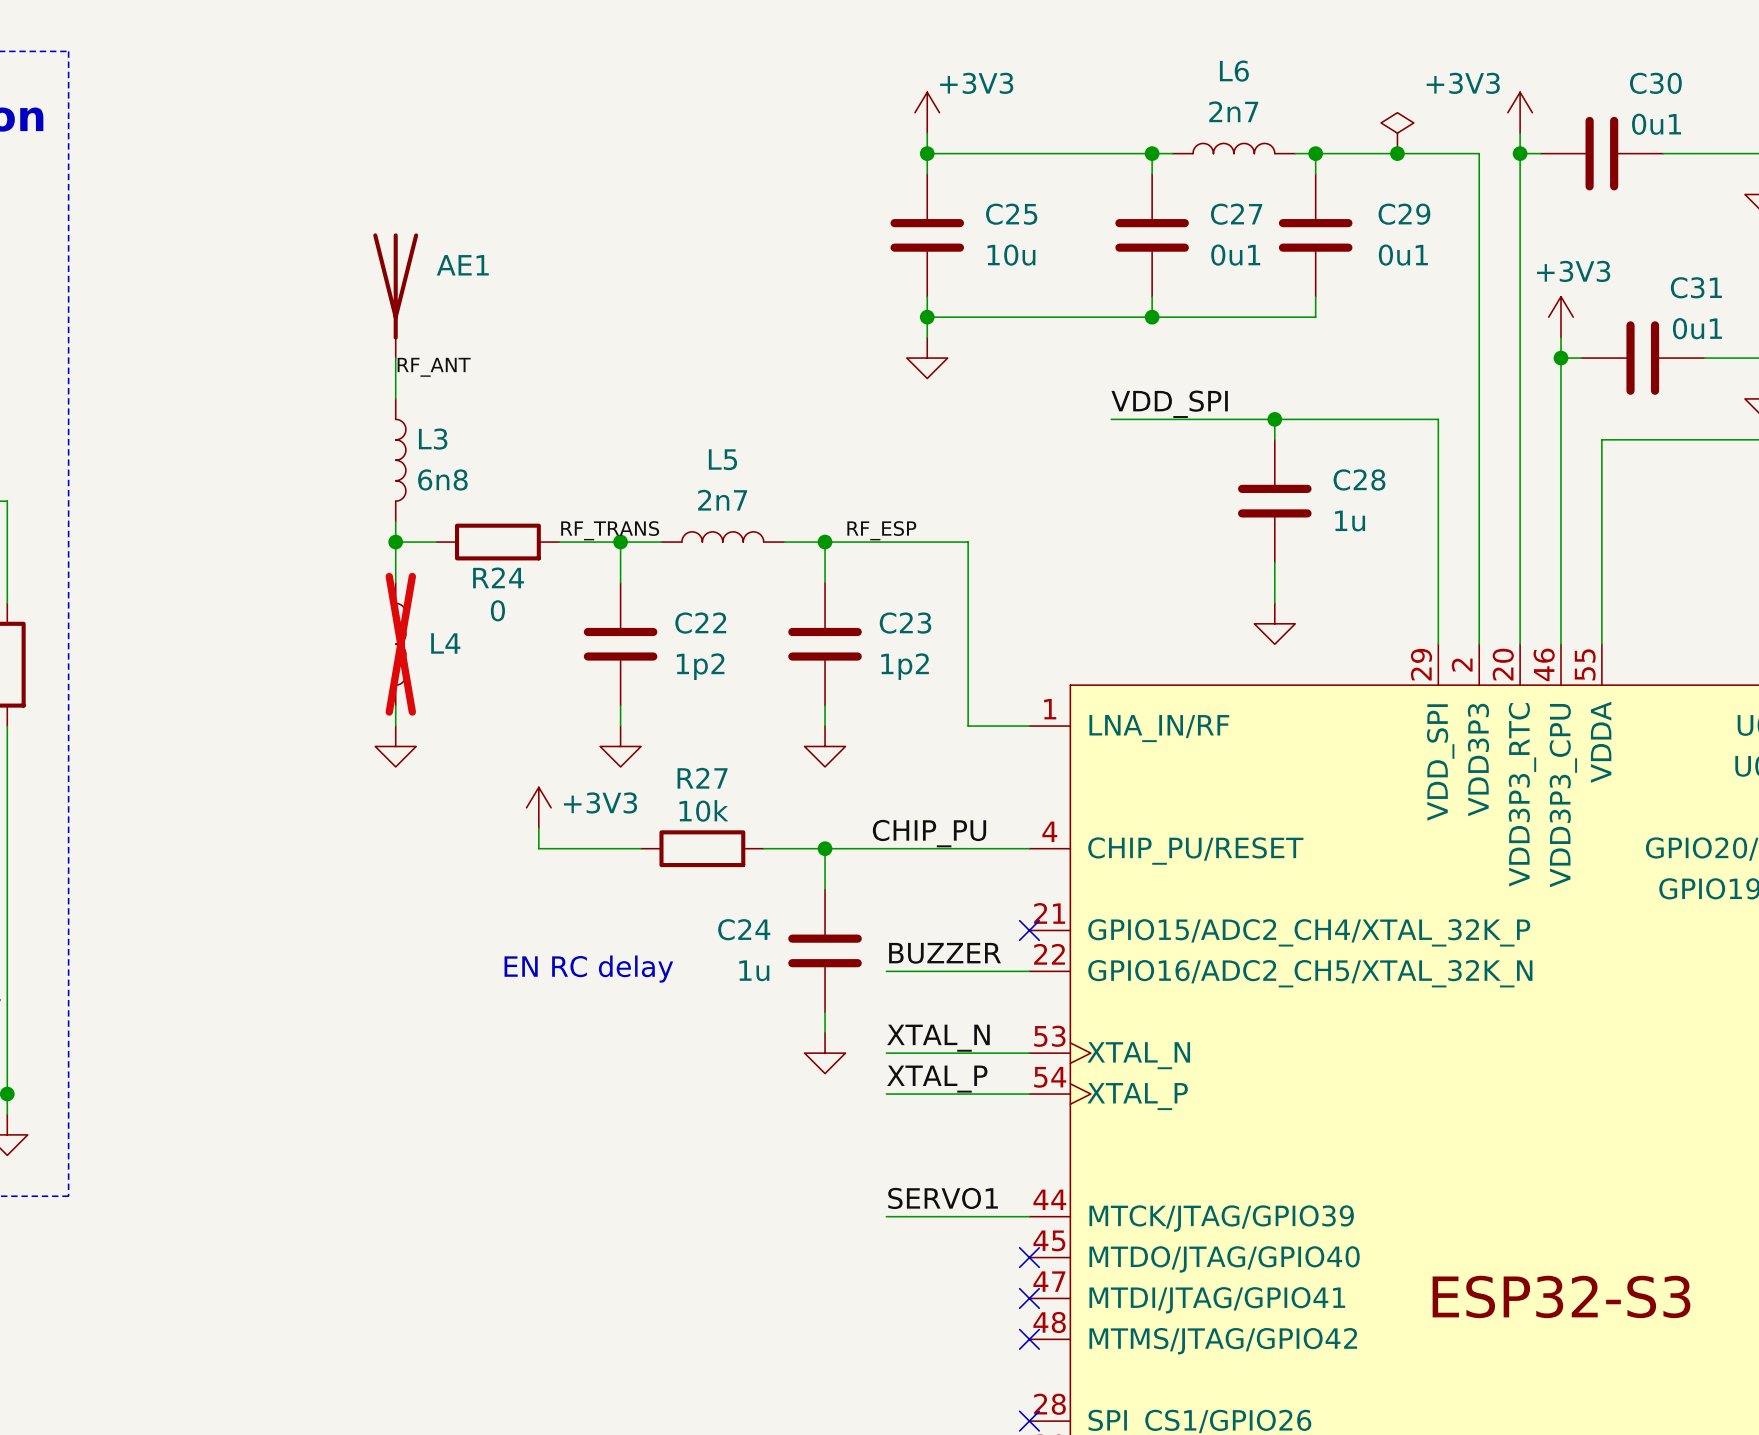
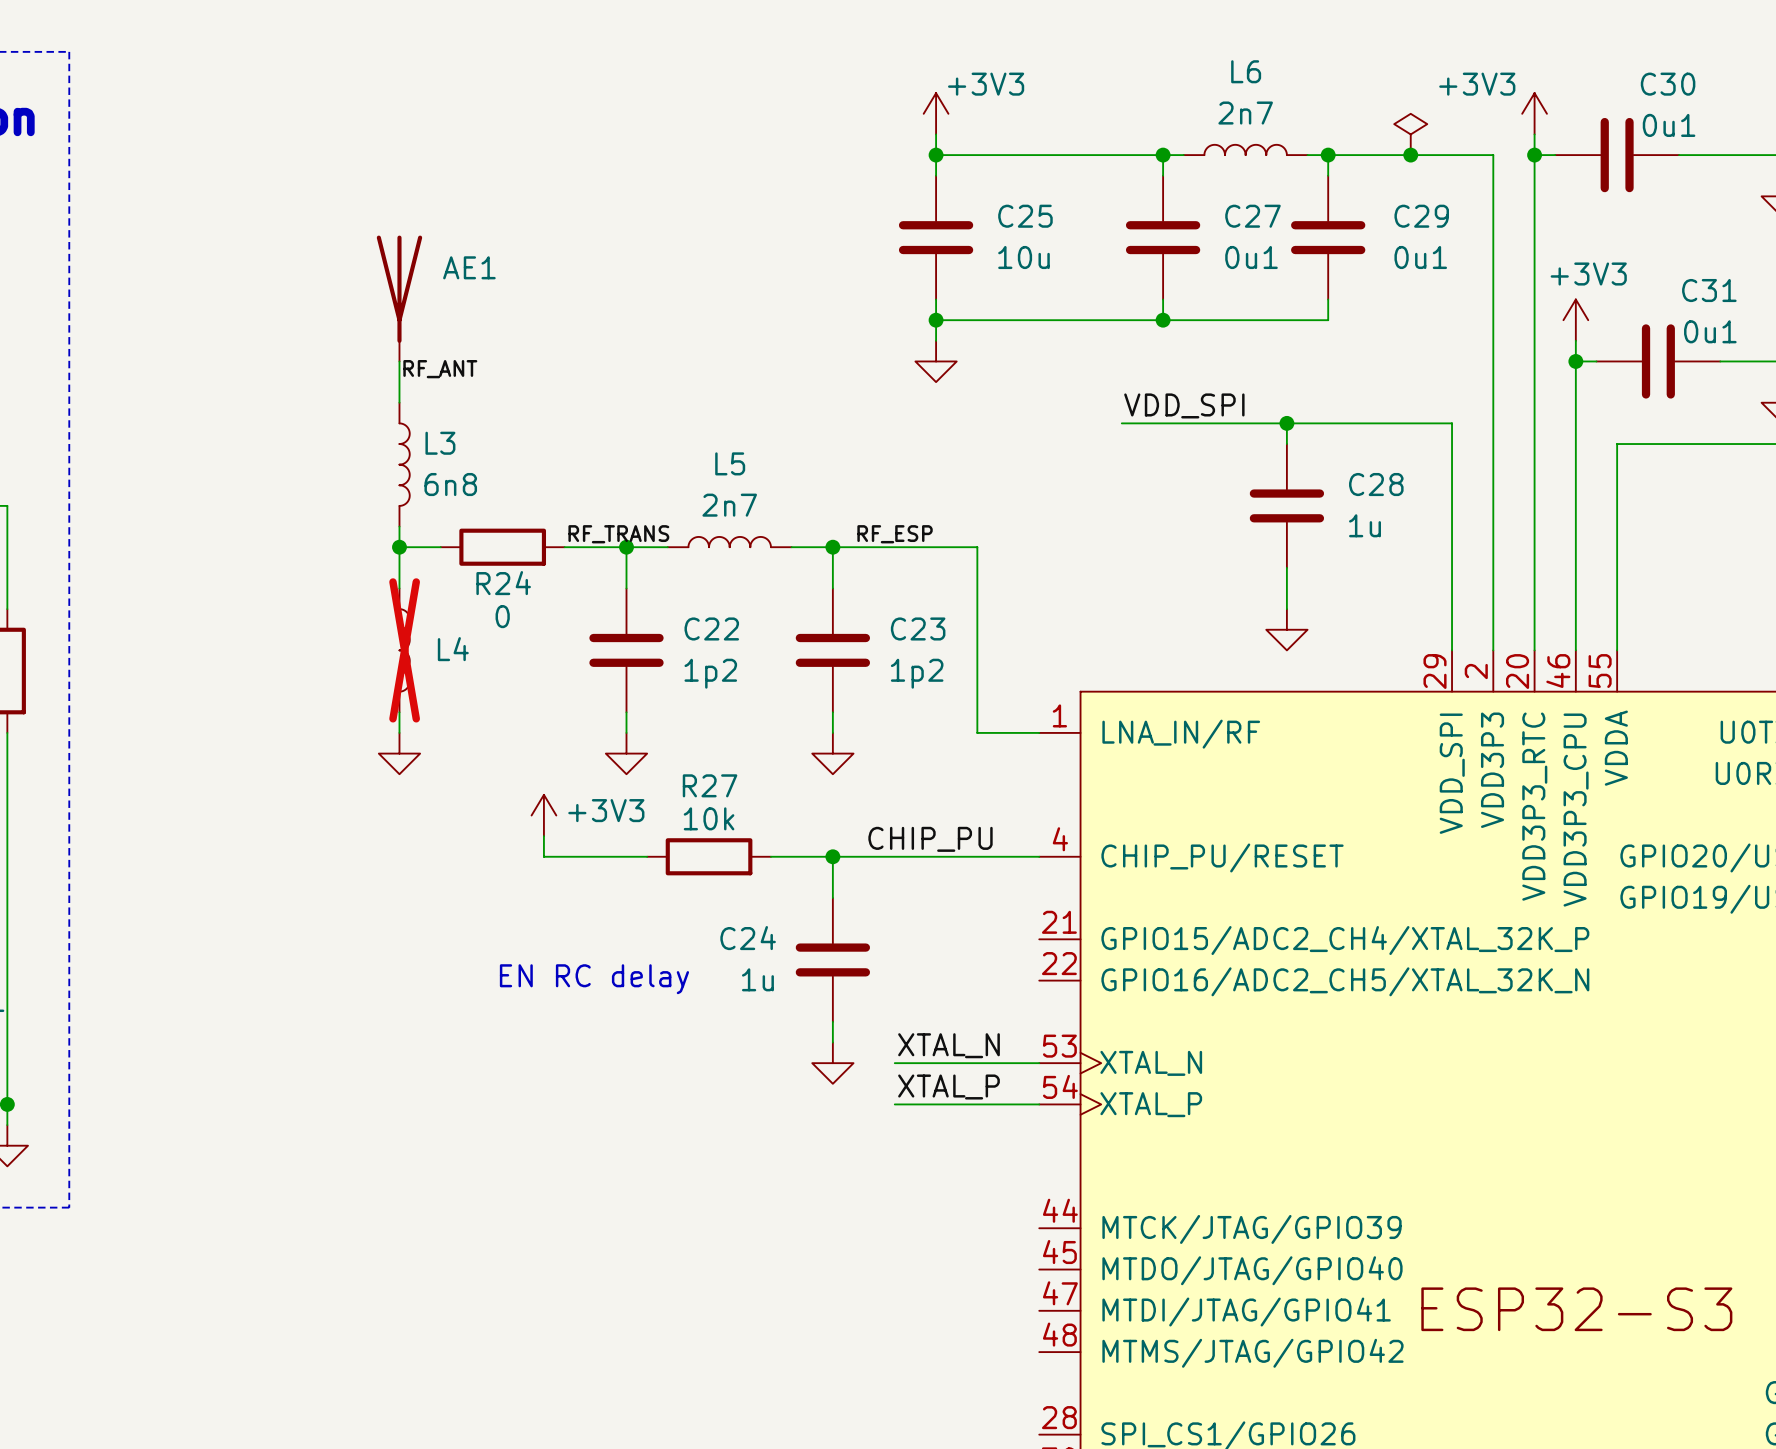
no-connect mark: (1029, 930) -> none
label: BUZZER (945, 953) -> none
wire: (886, 971) (1029, 971) -> none
label: SERVO1 (943, 1198) -> none
wire: (886, 1216) (1029, 1216) -> none
no-connect mark: (1029, 1257) -> none
no-connect mark: (1029, 1298) -> none
no-connect mark: (1029, 1339) -> none
no-connect mark: (1029, 1421) -> none

